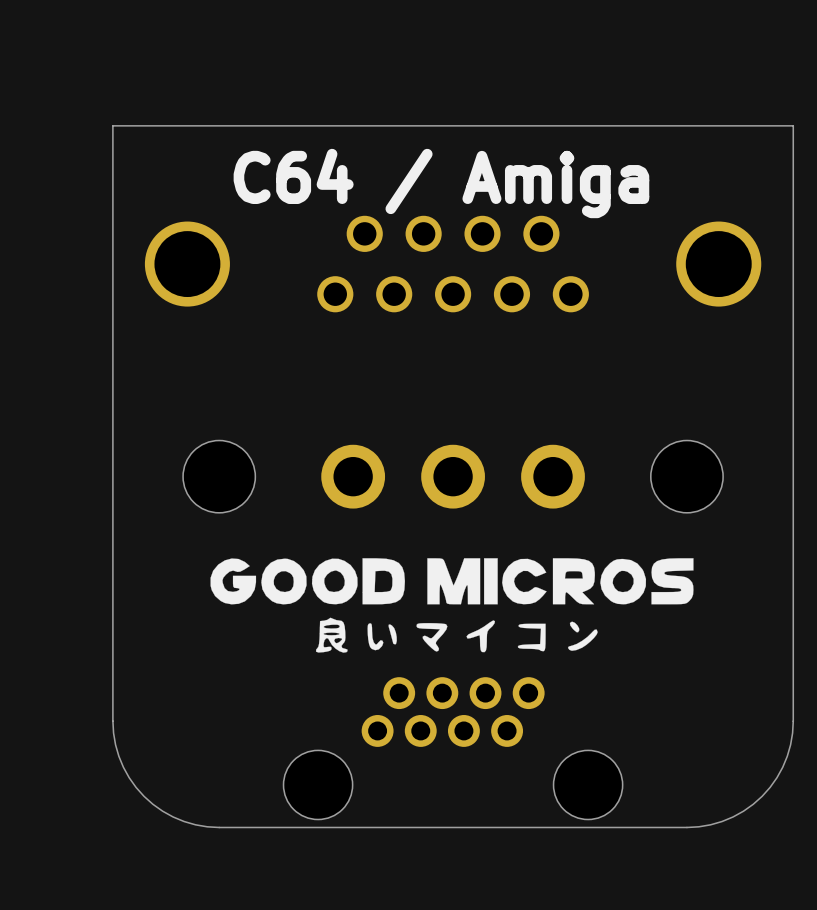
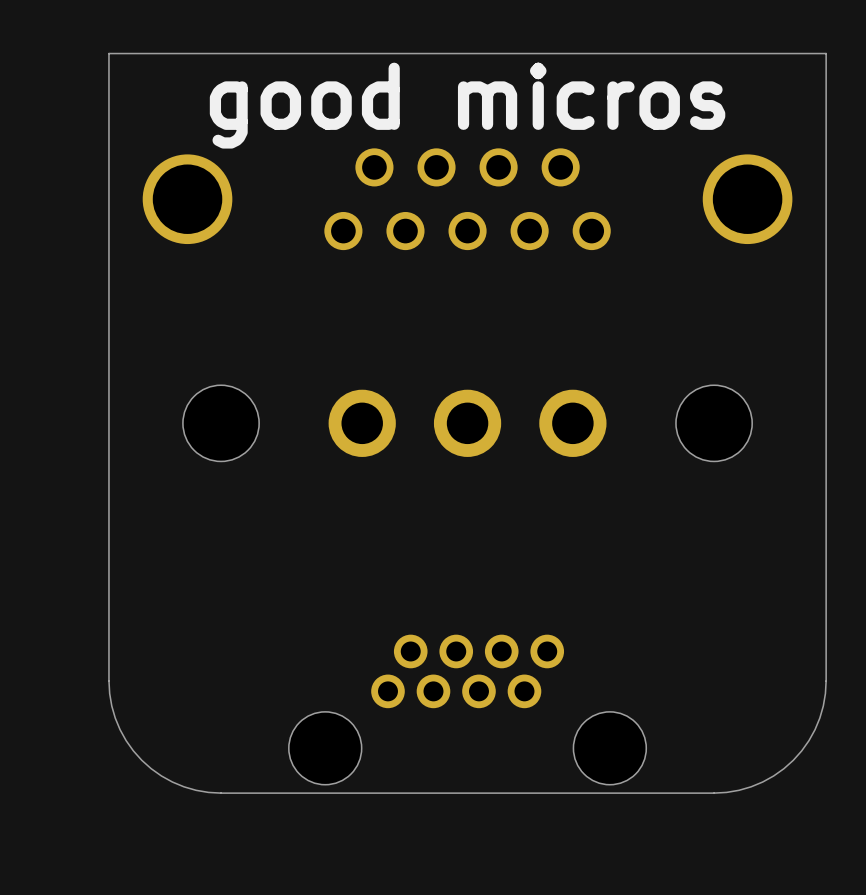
text: C64 / Amiga (441, 183) -> good micros (467, 105)
drawing: [210, 558, 694, 653] -> none

